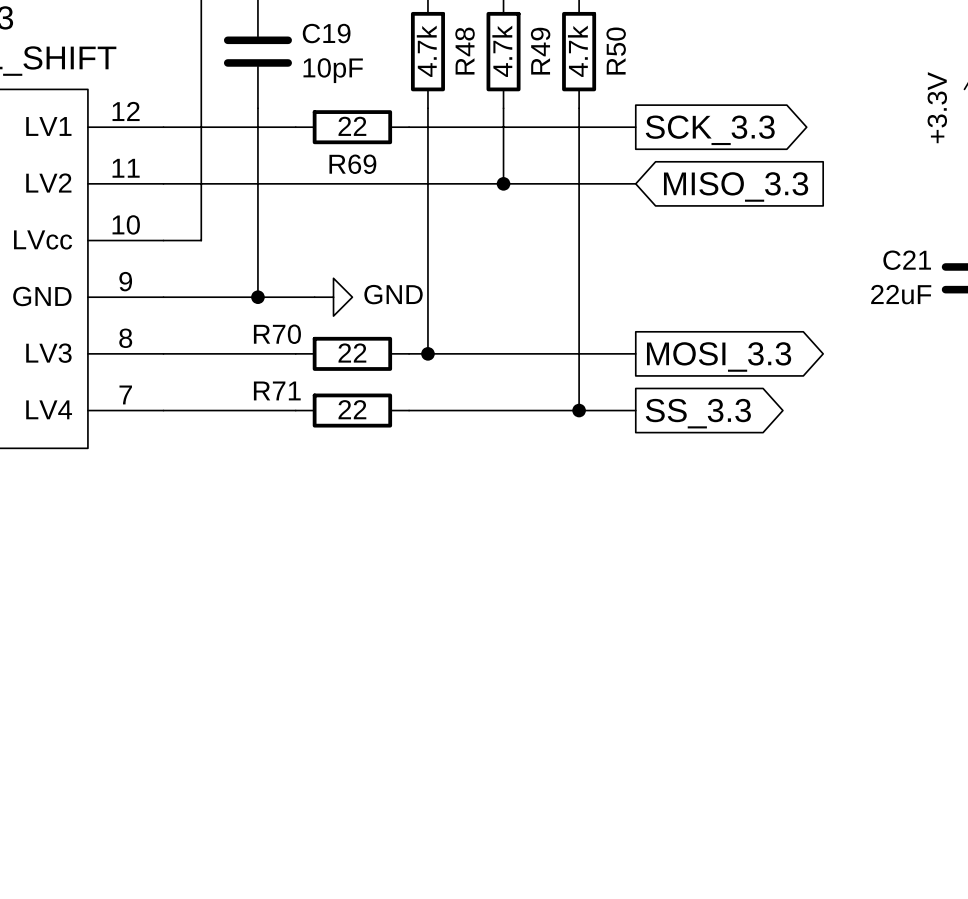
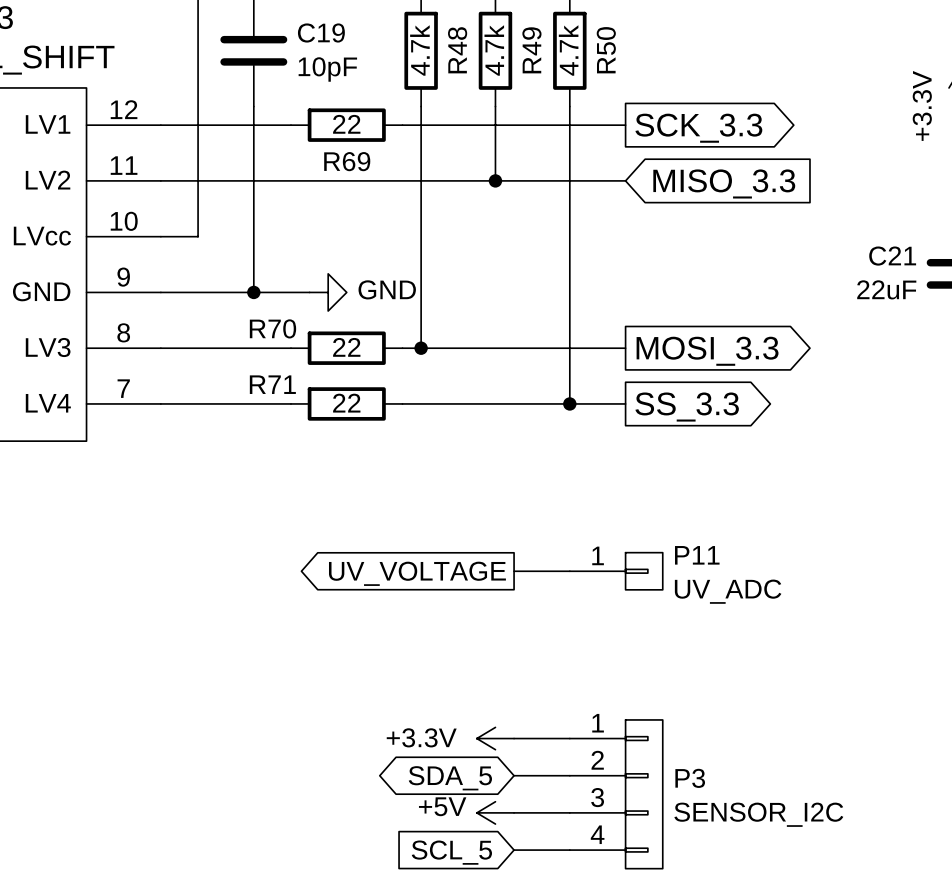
wire: none -> (514, 571) (569, 571)
P11: none -> UV_ADC (616, 571)
global label: none -> UV_VOLTAGE (417, 573)
power symbol: none -> +3.3V (495, 738)
wire: none -> (514, 738) (569, 738)
wire: none -> (514, 775) (569, 775)
global label: none -> SDA_5 (450, 778)
P3: none -> SENSOR_I2C (616, 794)
power symbol: none -> +5V (495, 812)
wire: none -> (514, 812) (569, 812)
wire: none -> (514, 850) (569, 850)
global label: none -> SCL_5 (451, 852)

